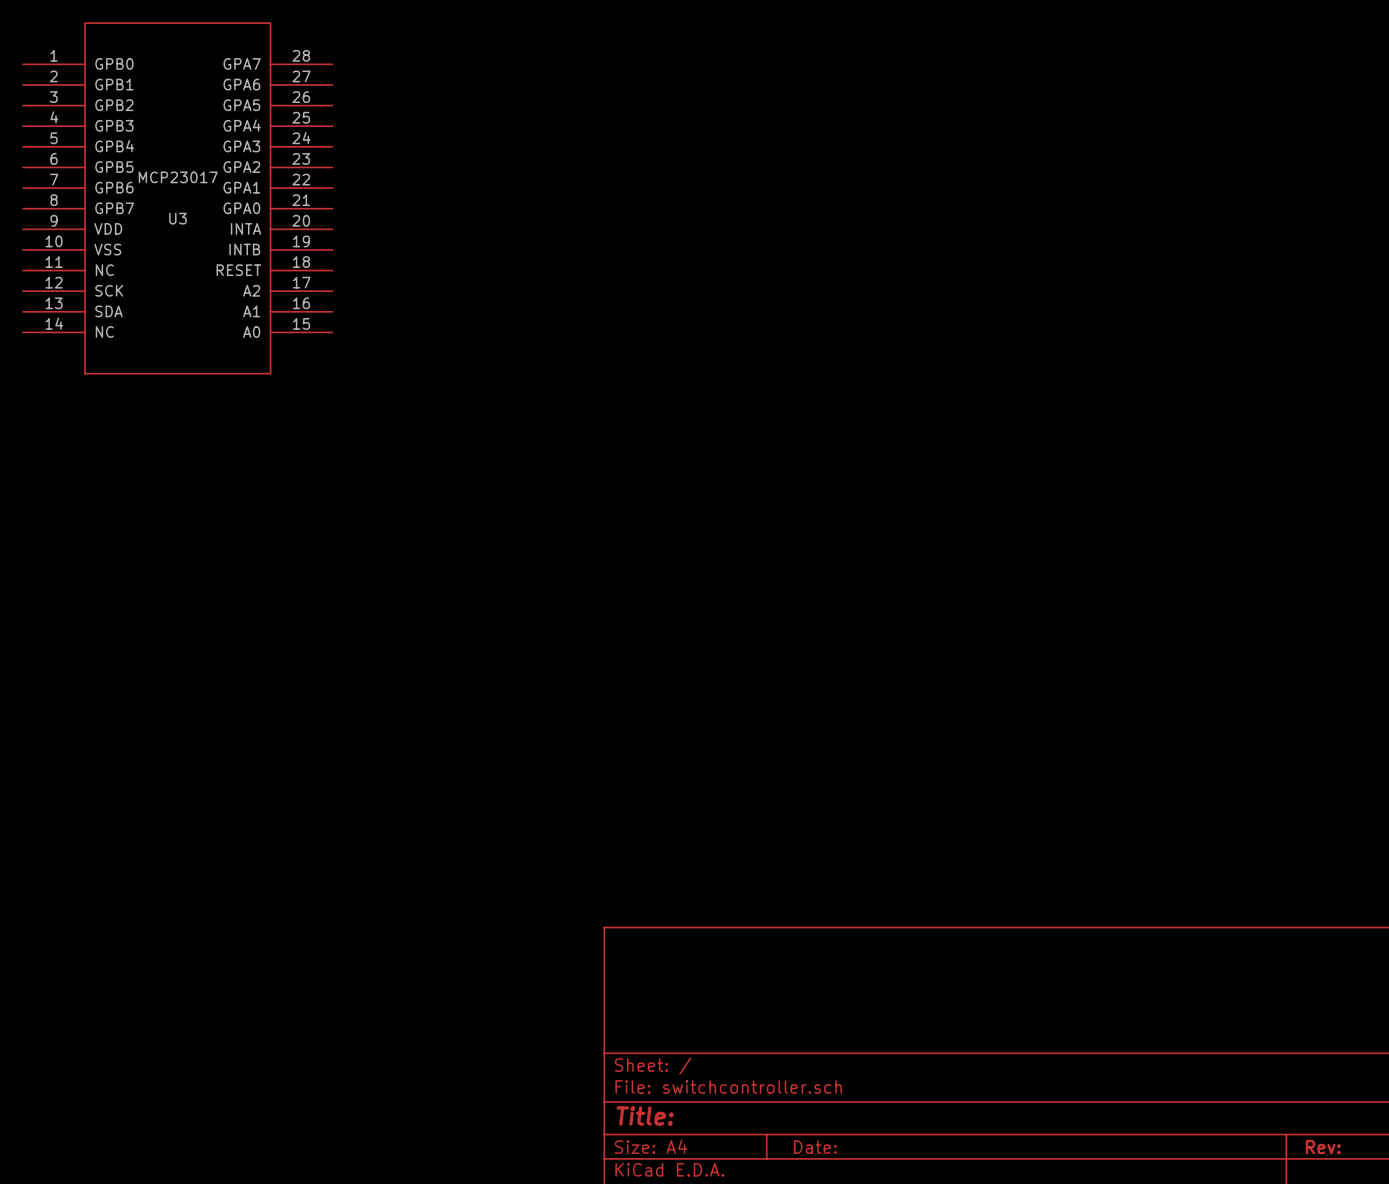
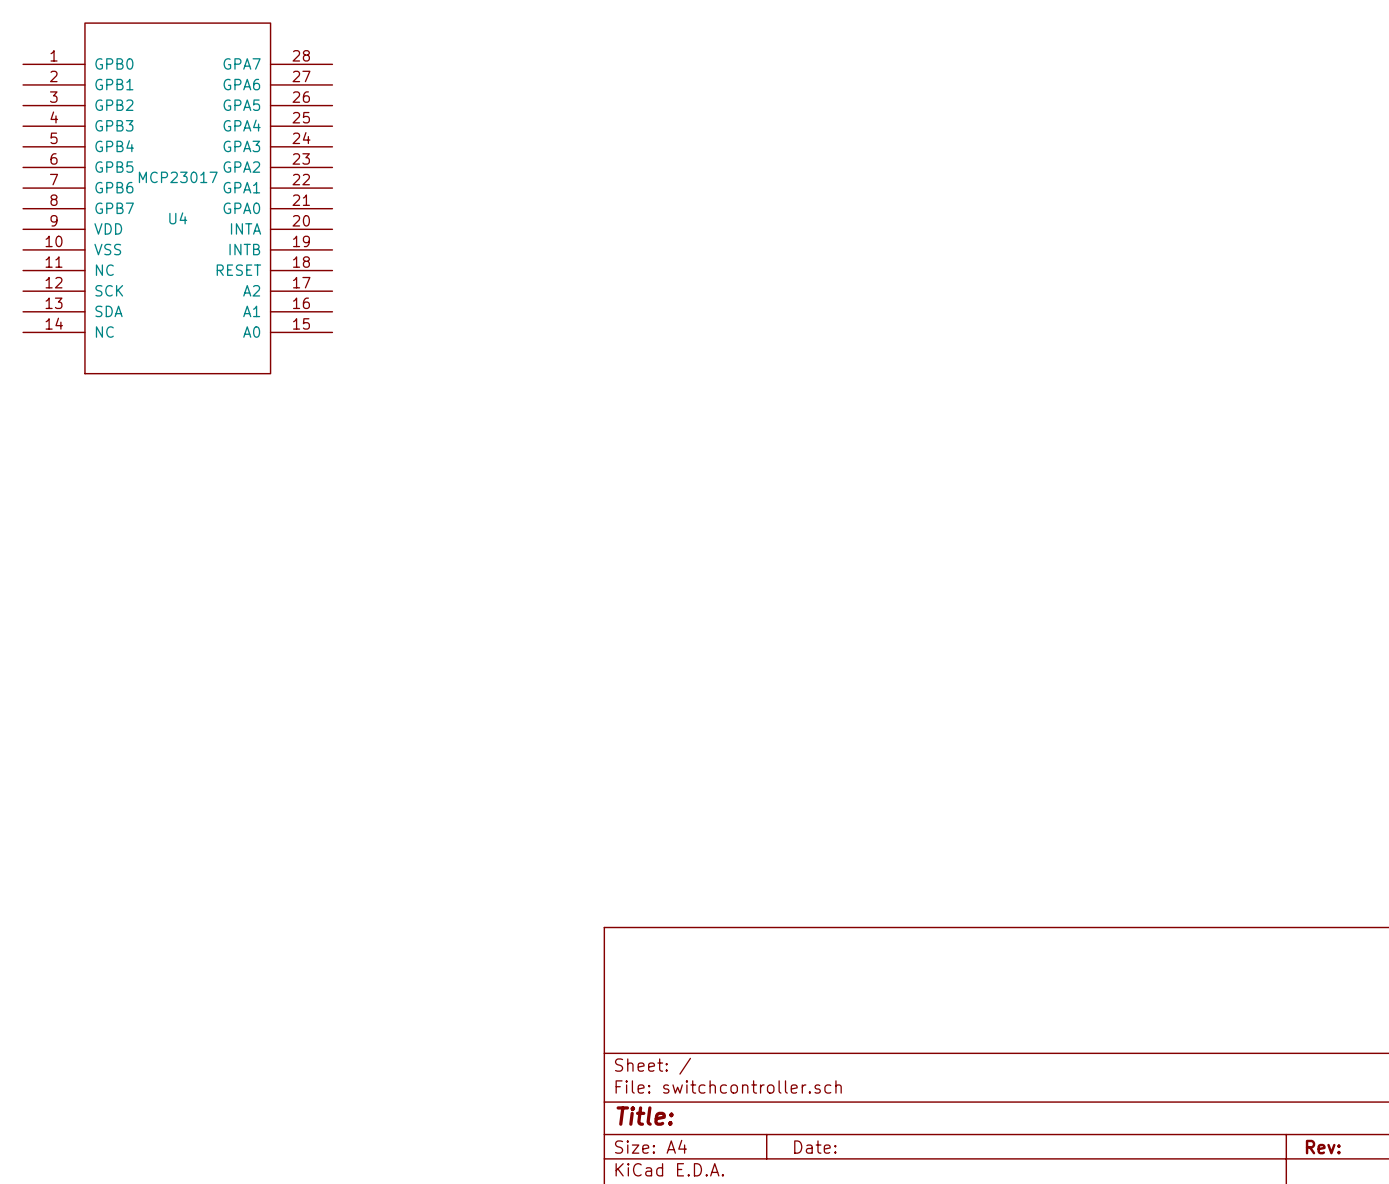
U3 name: U3 (178, 218) -> U4 (178, 218)

